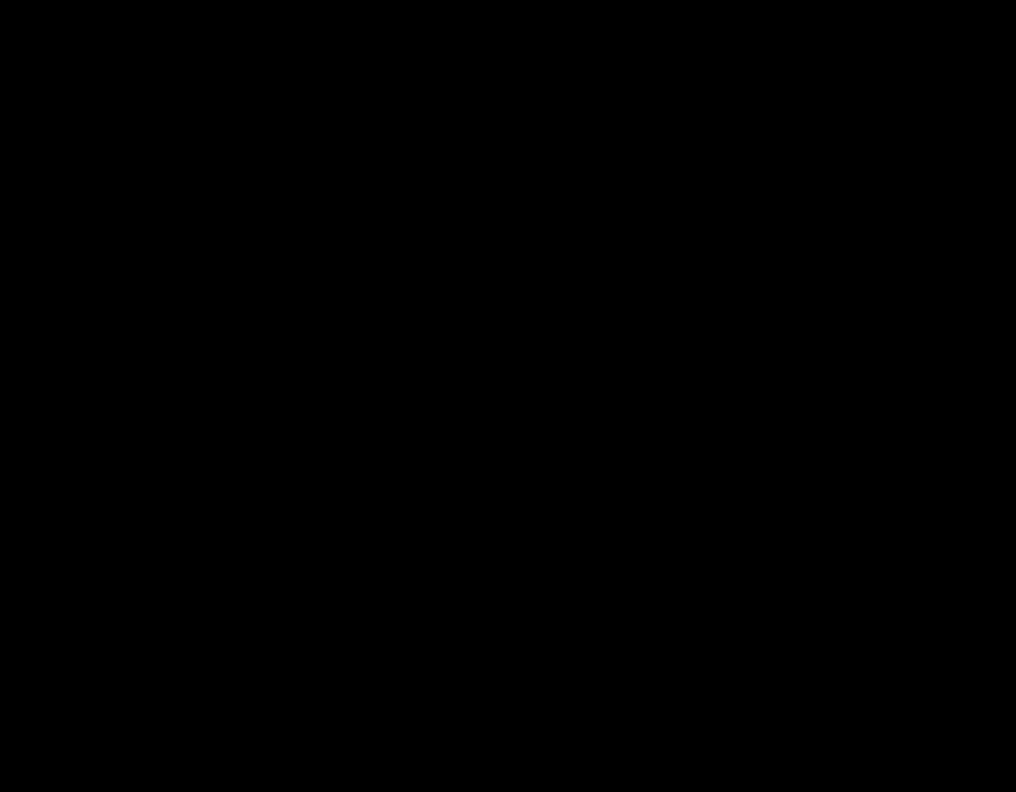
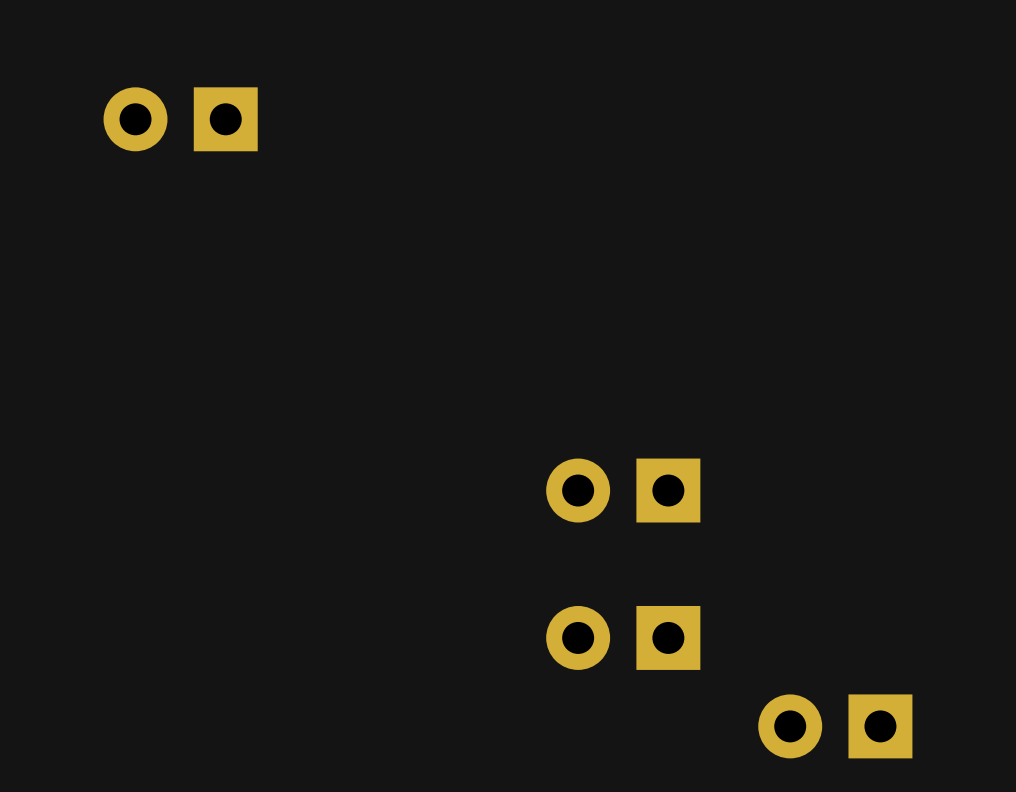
part: none -> (180, 119)
part: none -> (623, 490)
part: none -> (623, 637)
part: none -> (835, 726)

